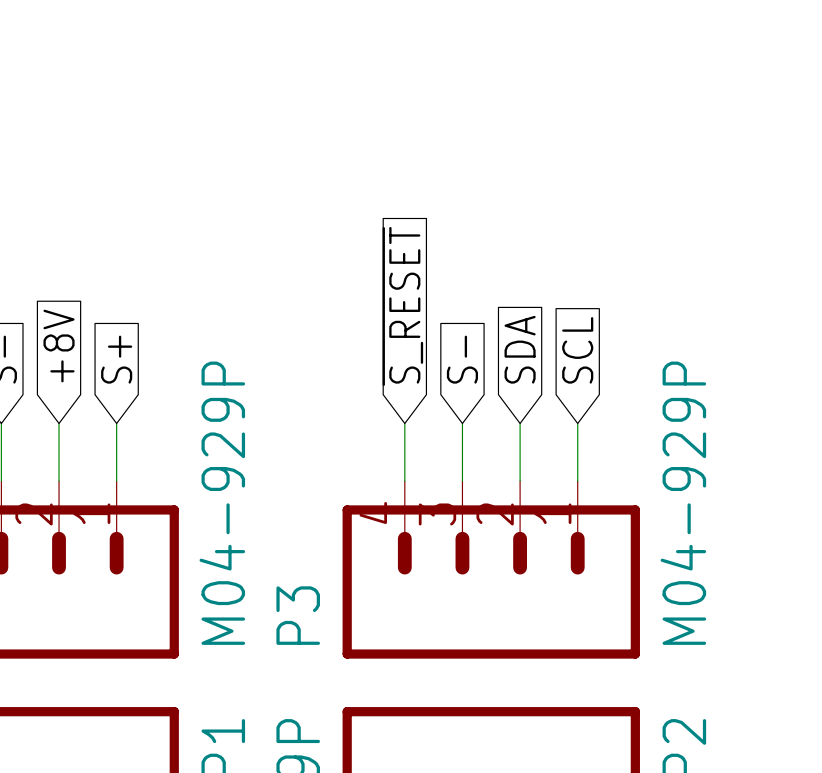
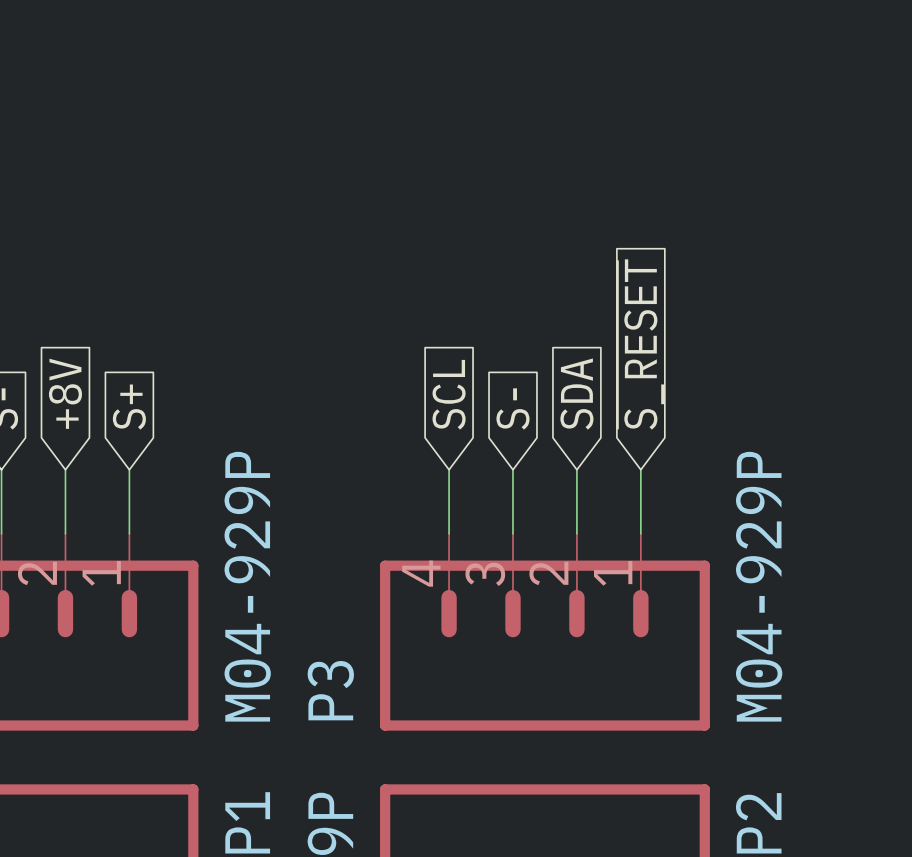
global label: ~{S_RESET} (402, 306) -> SCL (449, 394)
global label: SCL (577, 350) -> ~{S_RESET} (641, 344)

